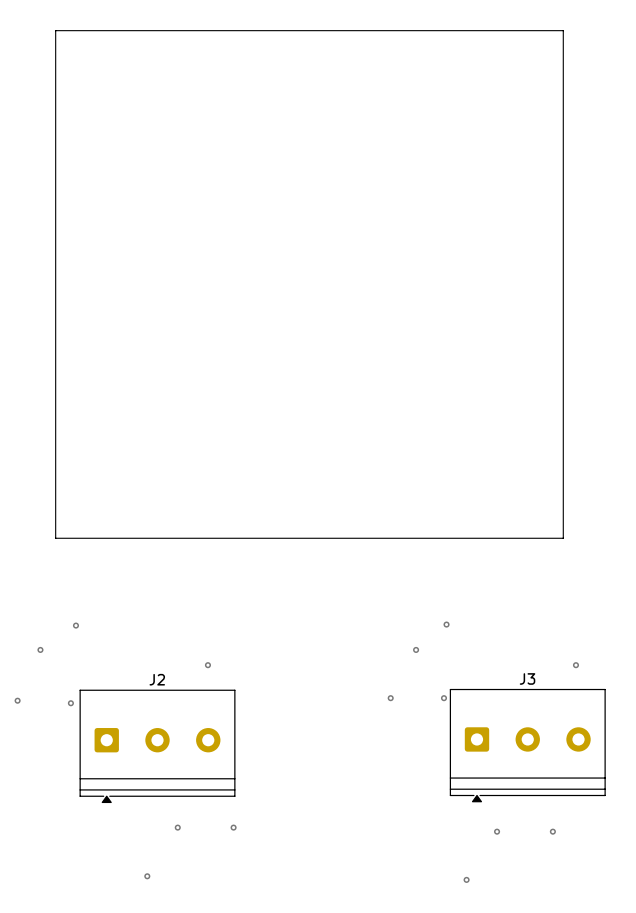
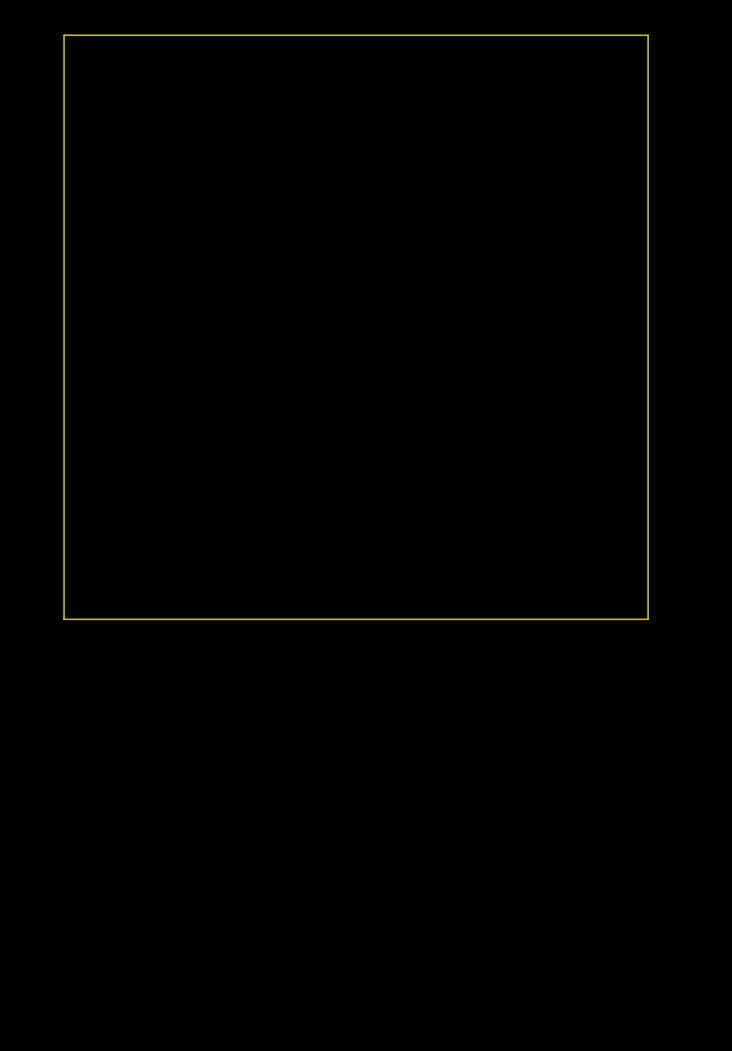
via: (446, 624) -> none
via: (75, 625) -> none
via: (40, 649) -> none
via: (416, 649) -> none
via: (207, 665) -> none
via: (575, 665) -> none
via: (390, 698) -> none
via: (444, 698) -> none
via: (17, 700) -> none
via: (70, 703) -> none
J3: (527, 745) -> none
J2: (157, 746) -> none
via: (177, 827) -> none
via: (233, 827) -> none
via: (497, 831) -> none
via: (552, 831) -> none
via: (147, 876) -> none
via: (466, 879) -> none

